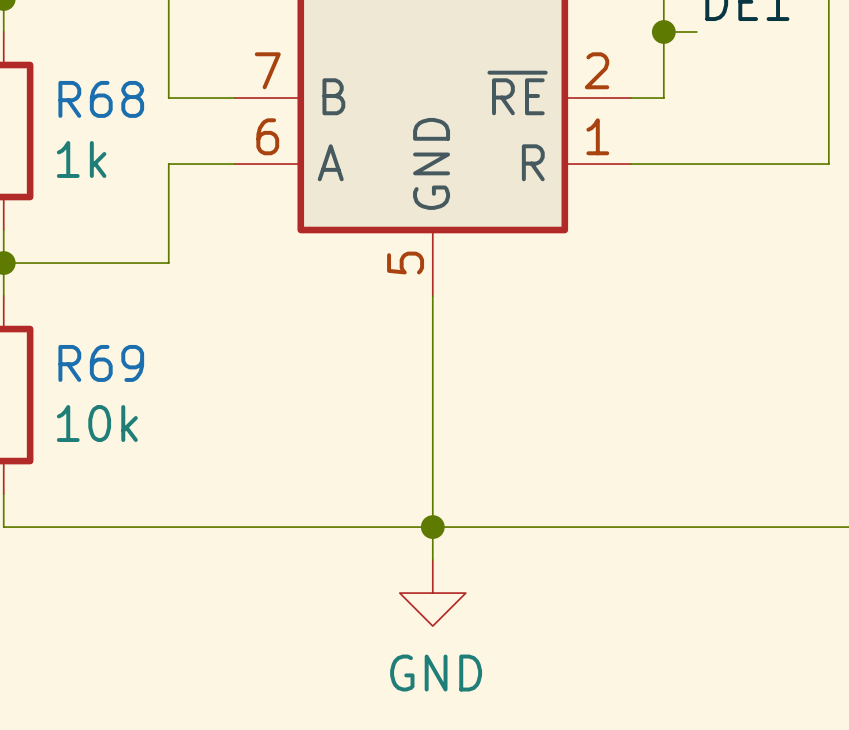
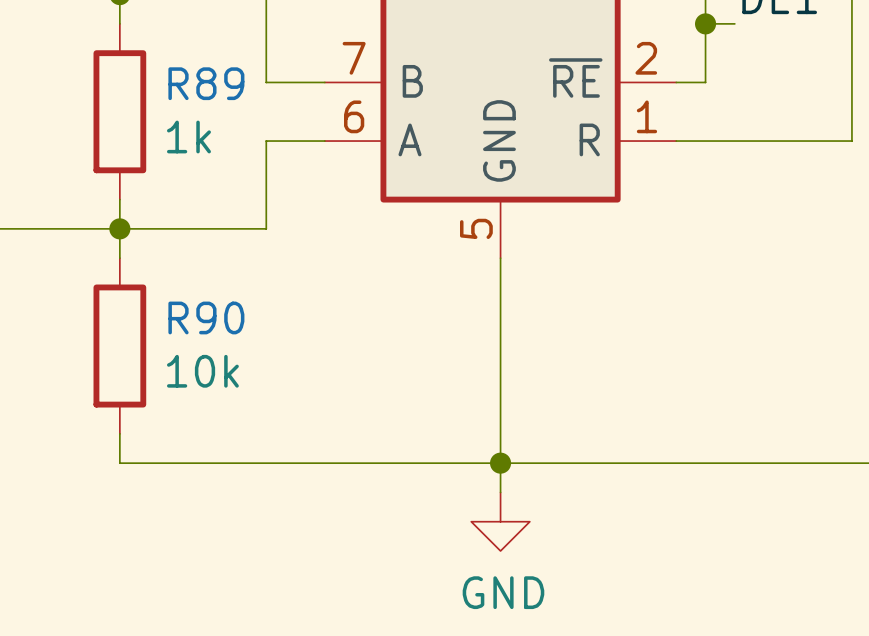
R68 name: R68 (101, 99) -> R89 (206, 83)
R69 name: R69 (101, 363) -> R90 (206, 317)

